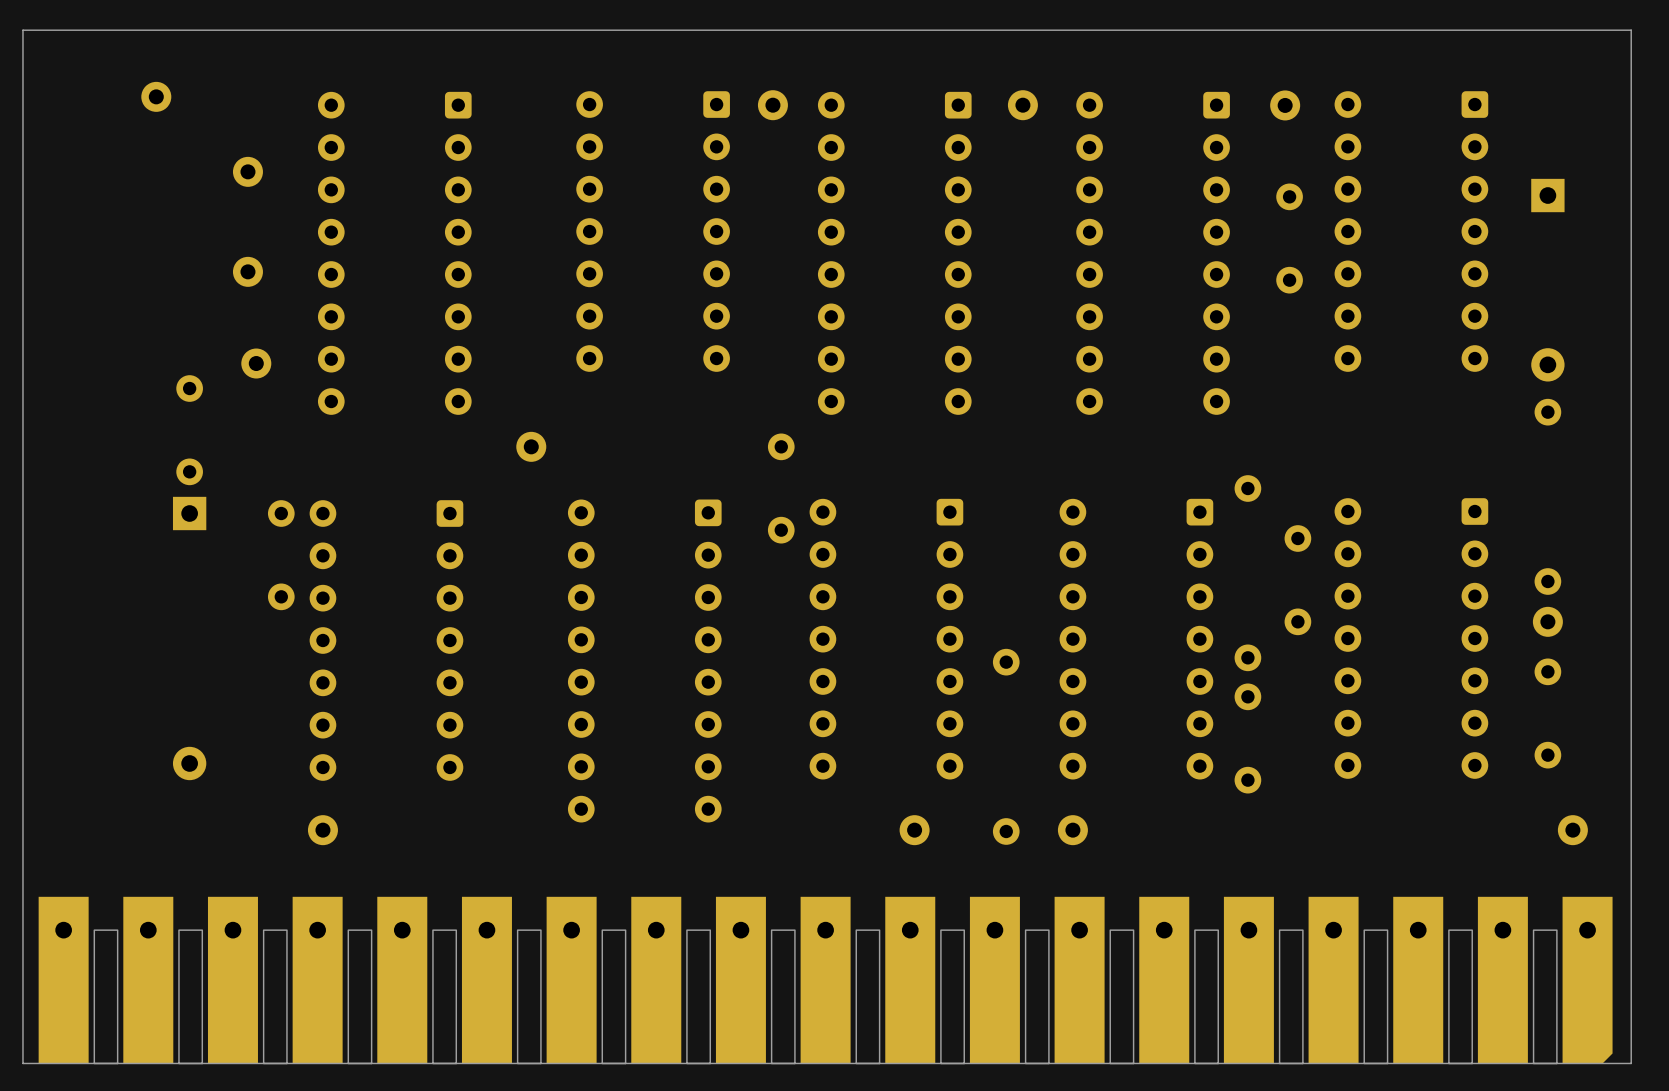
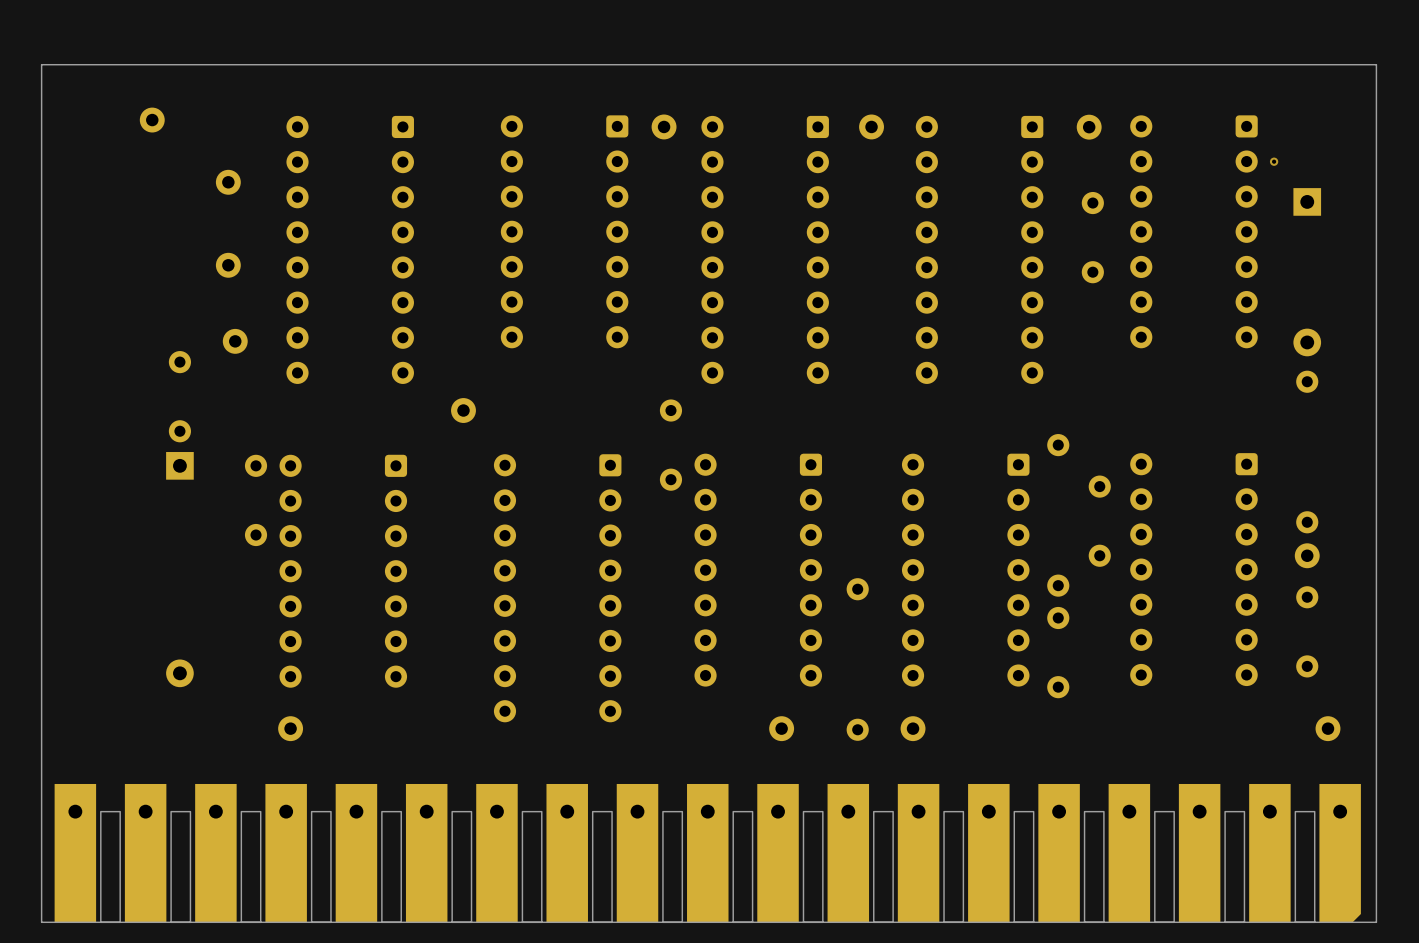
via: none -> (1274, 161)

